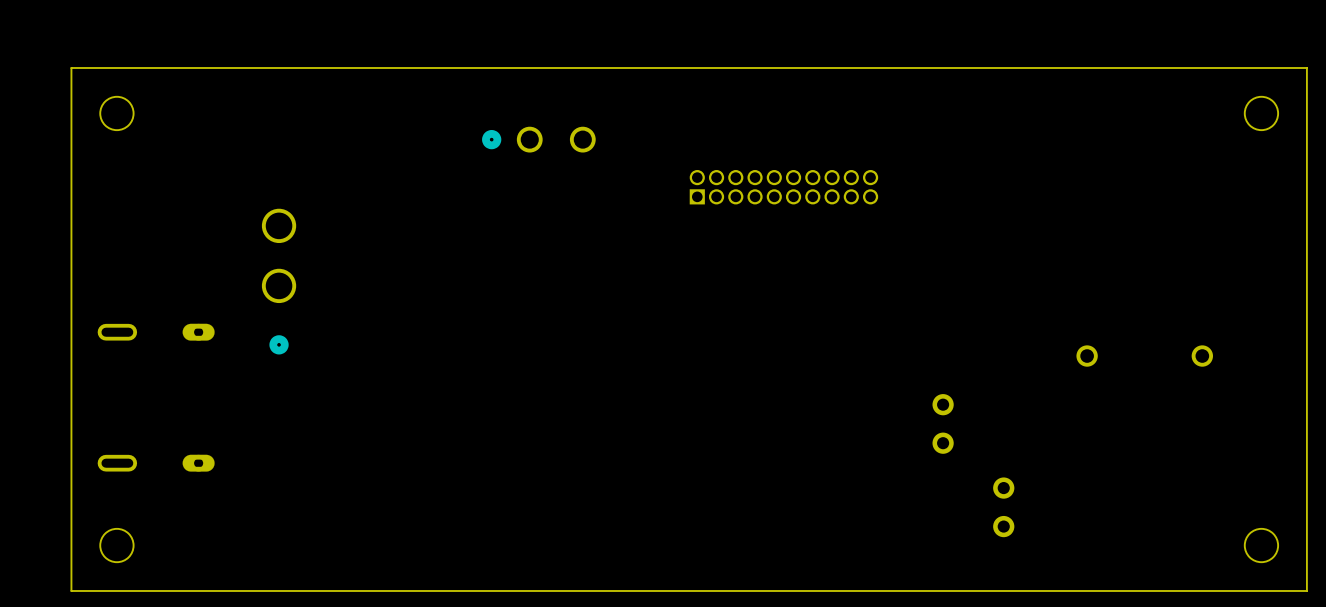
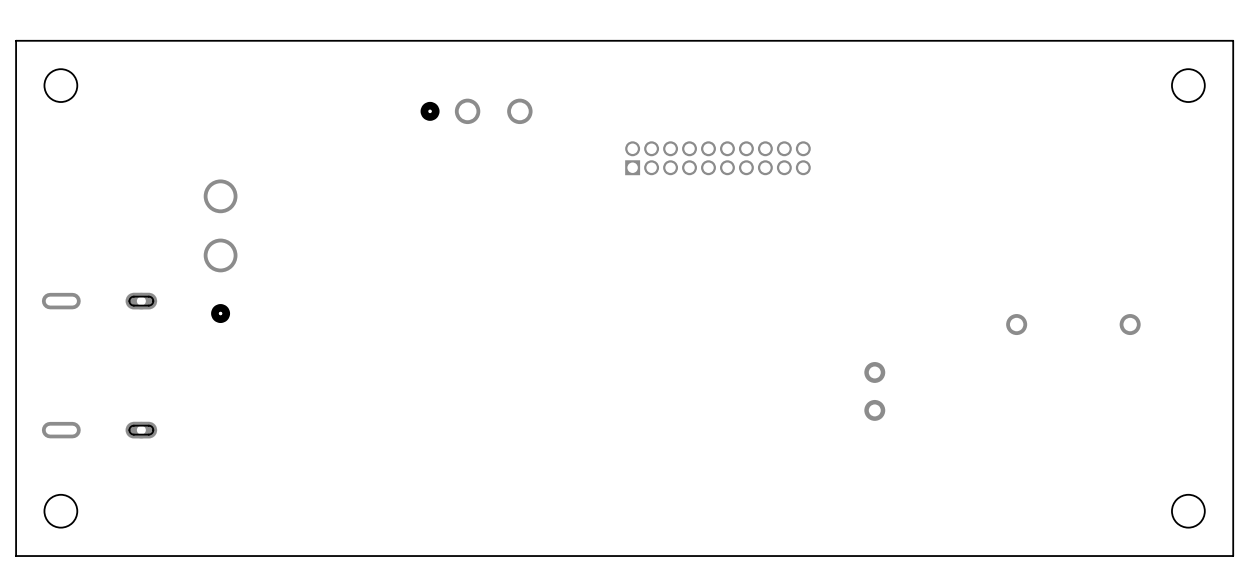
part: (1003, 507) -> none

